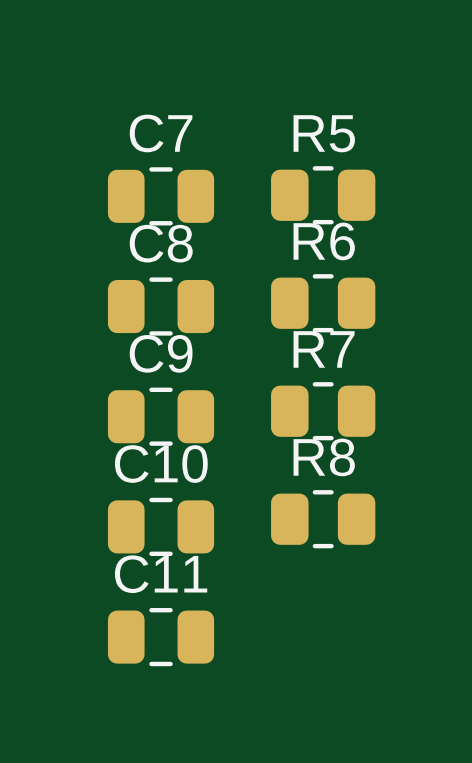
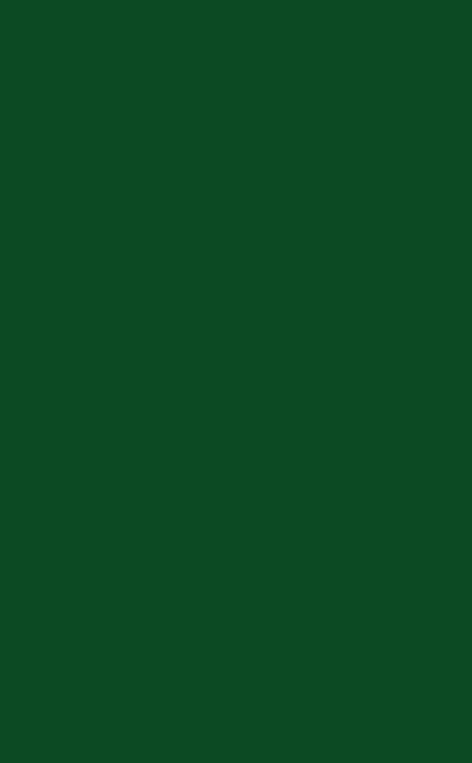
R5: (323, 195) -> none
C7: (161, 196) -> none
R6: (323, 303) -> none
C8: (161, 306) -> none
R7: (323, 411) -> none
C9: (161, 416) -> none
R8: (323, 519) -> none
C10: (161, 526) -> none
C11: (161, 637) -> none

